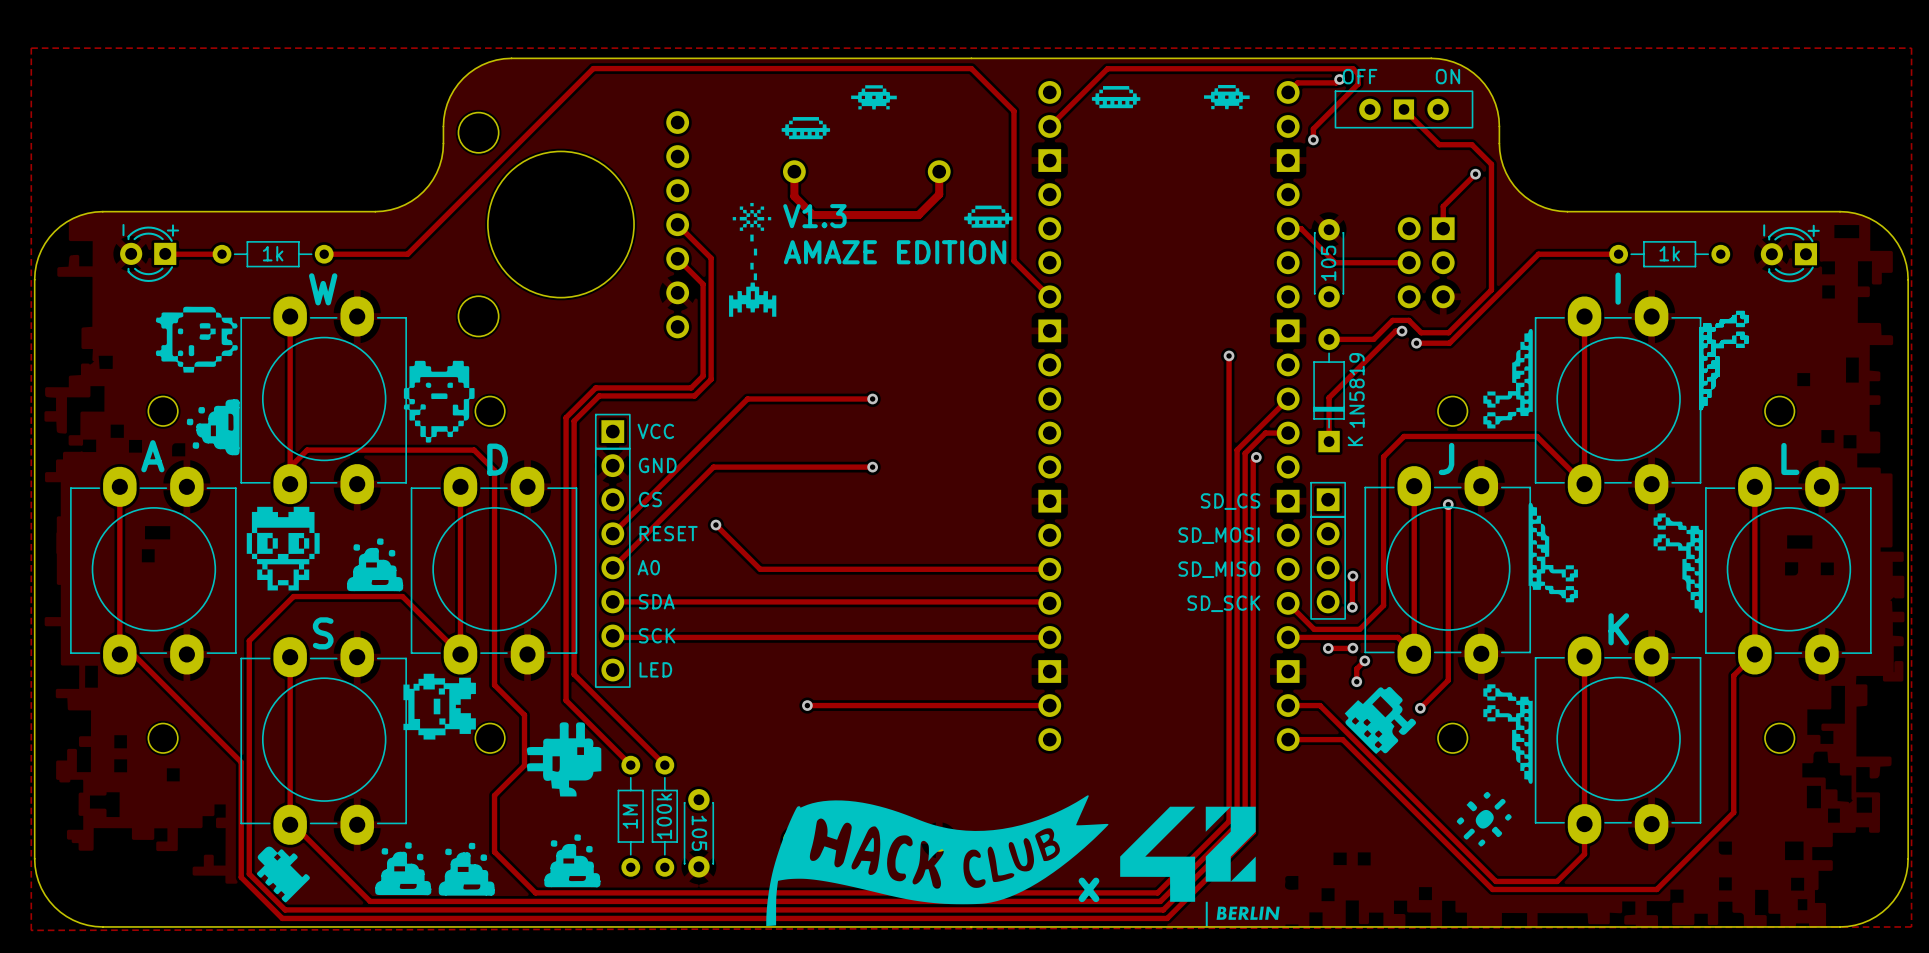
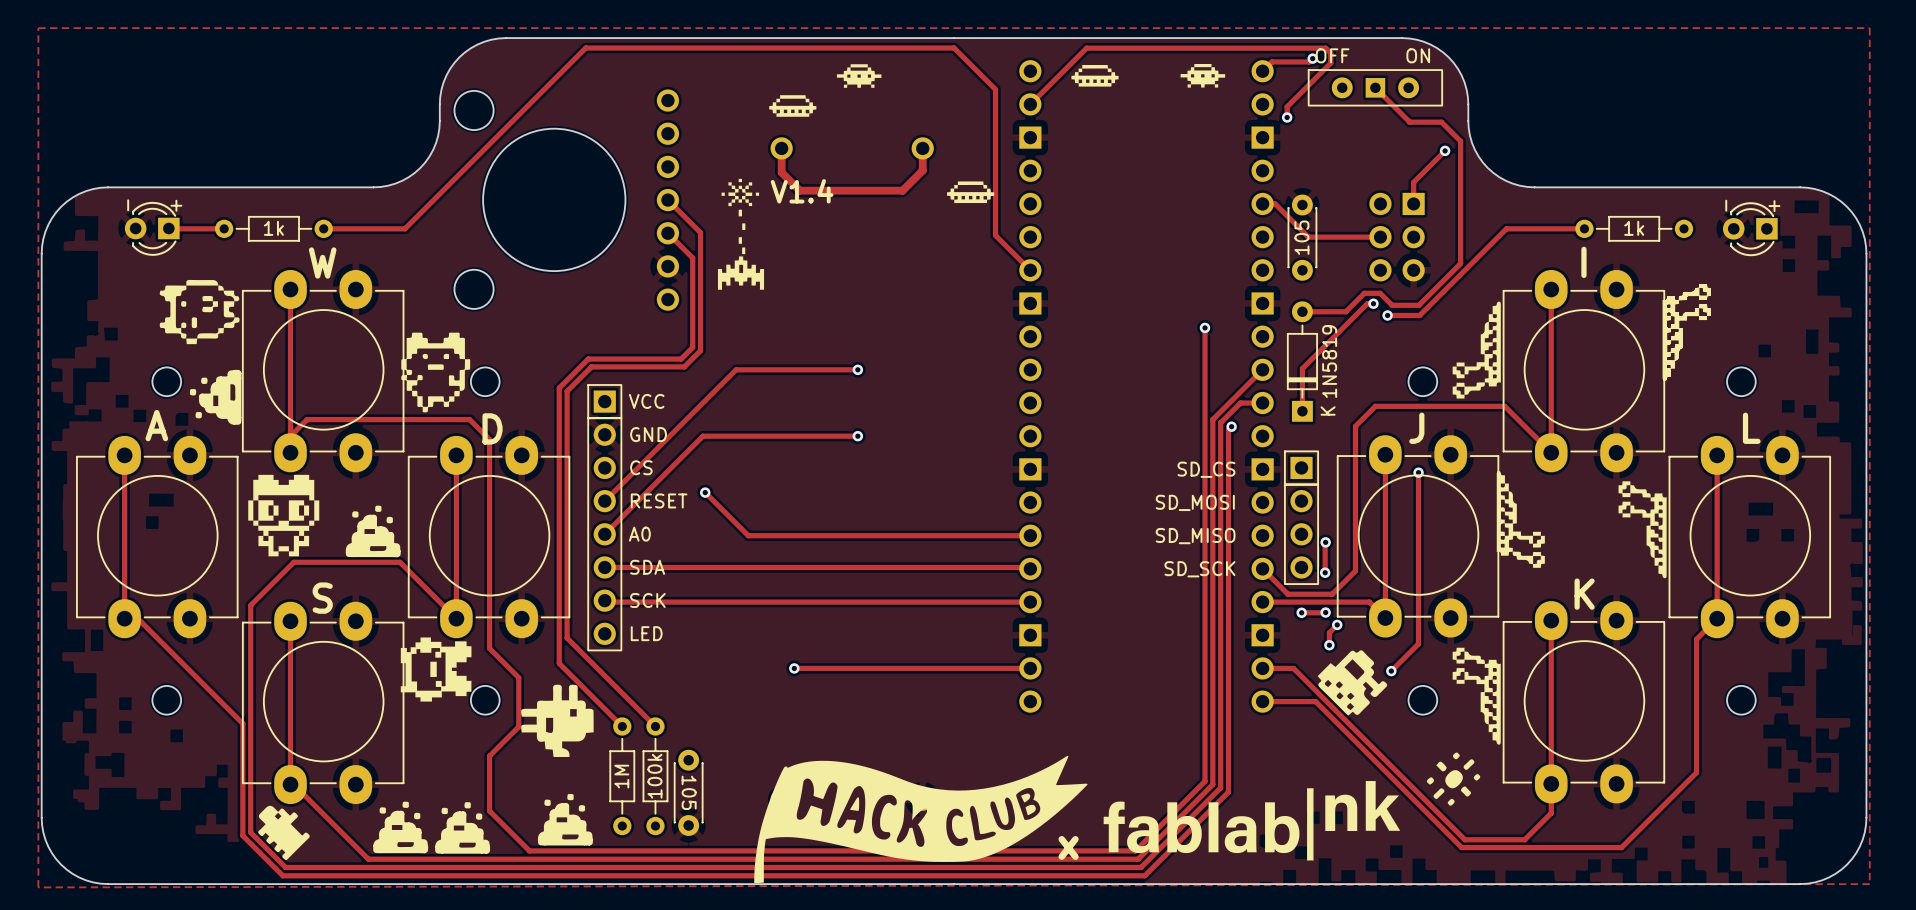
text: V1.3 (814, 216) -> V1.4 (802, 191)
text: AMAZE EDITION (895, 252) -> none
drawing: [1120, 806, 1280, 927] -> none
drawing: none -> [1103, 781, 1401, 861]

